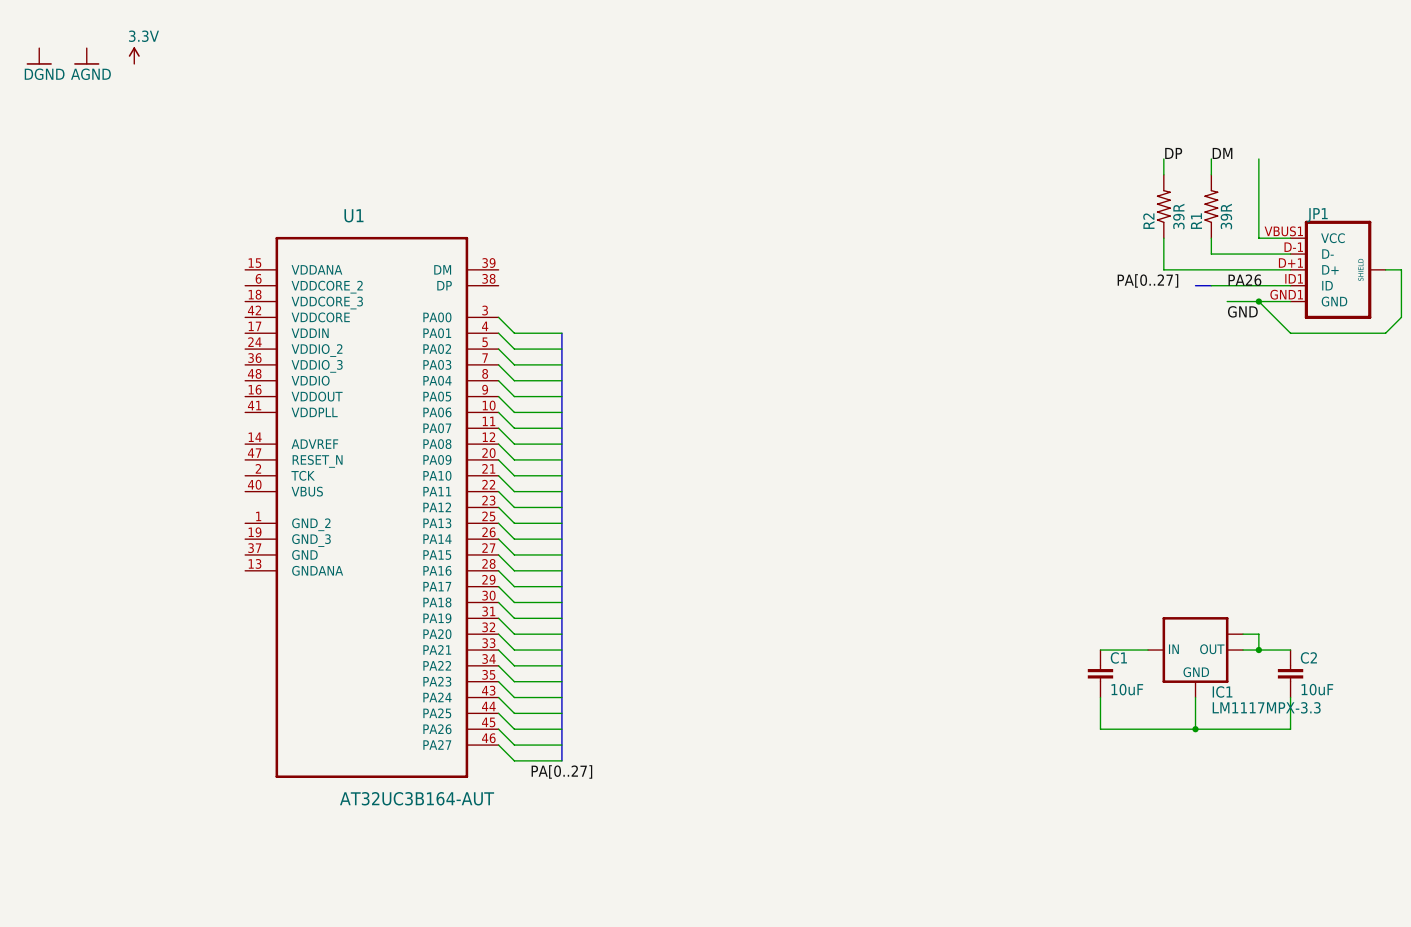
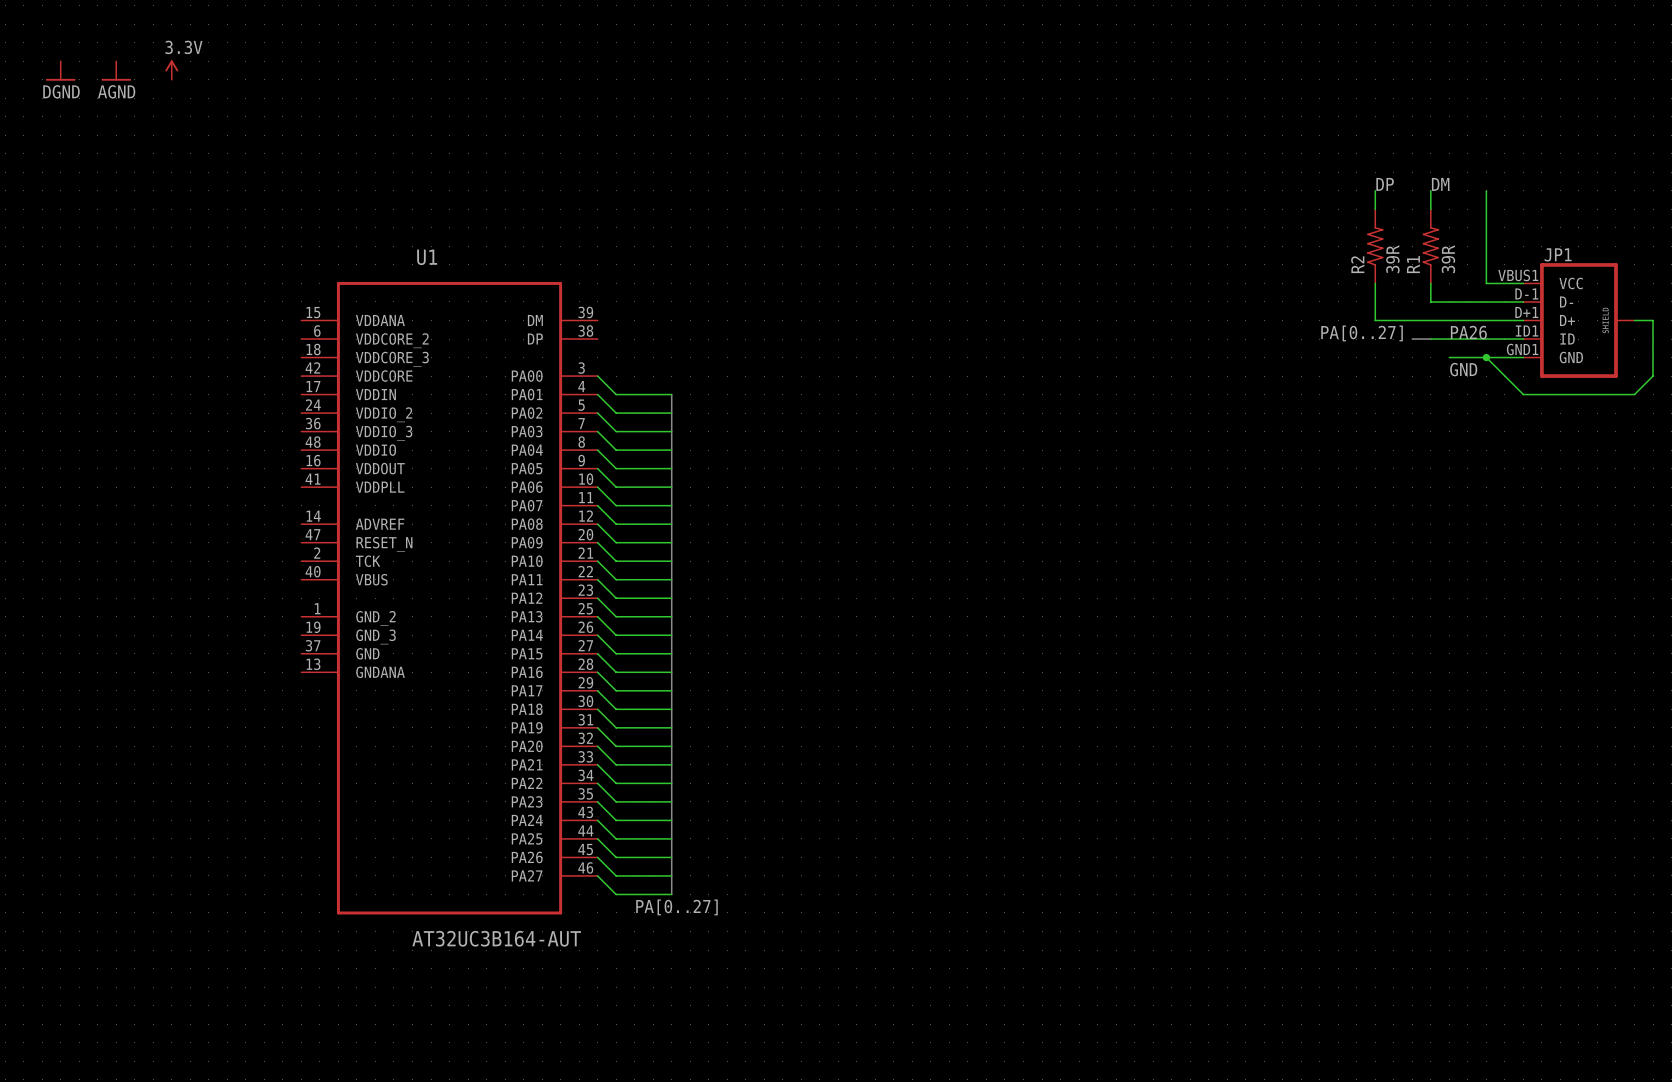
wire: (1243, 634) (1258, 634) (1258, 650) -> none
wire: (1100, 650) (1147, 650) -> none
wire: (1243, 650) (1290, 650) -> none
junction: (1258, 650) -> none
IC1: LM1117MPX-3.3 (1195, 657) -> none
C1: 10uF (1100, 673) -> none
C2: 10uF (1290, 673) -> none
wire: (1100, 697) (1100, 729) (1290, 729) (1290, 697) -> none
wire: (1195, 697) (1195, 729) -> none
junction: (1195, 729) -> none

